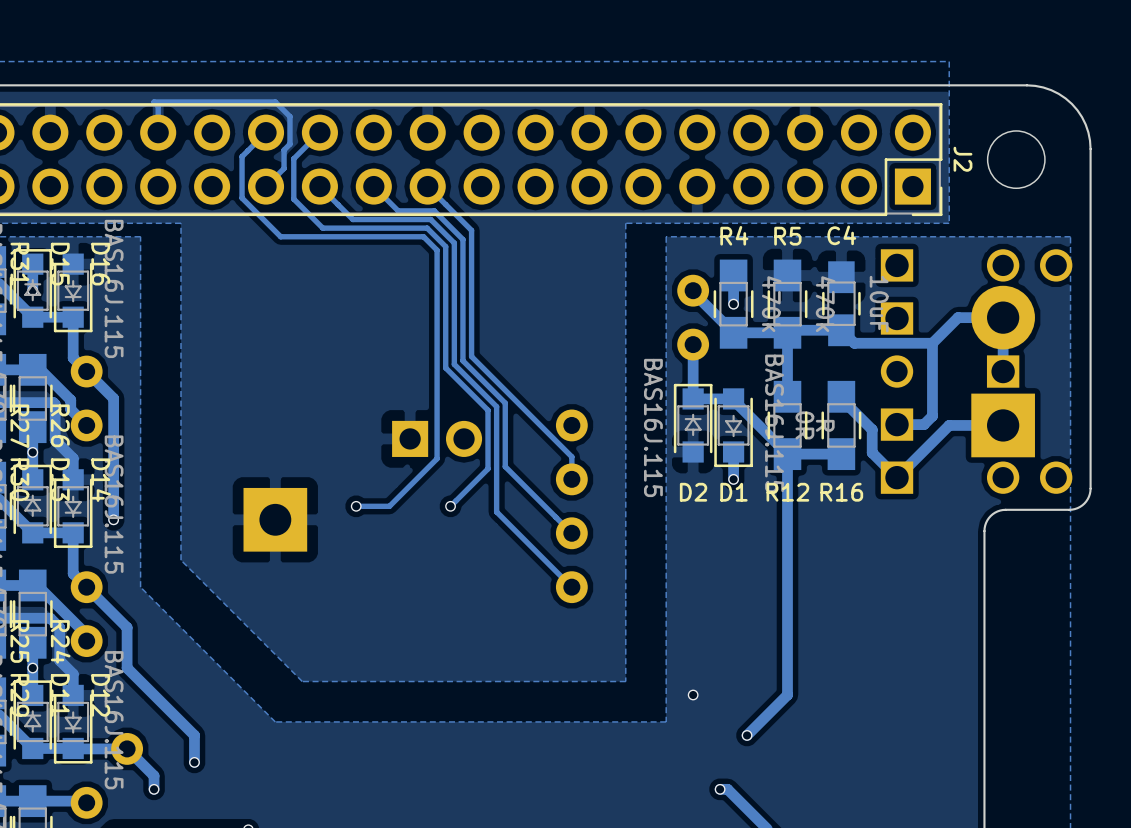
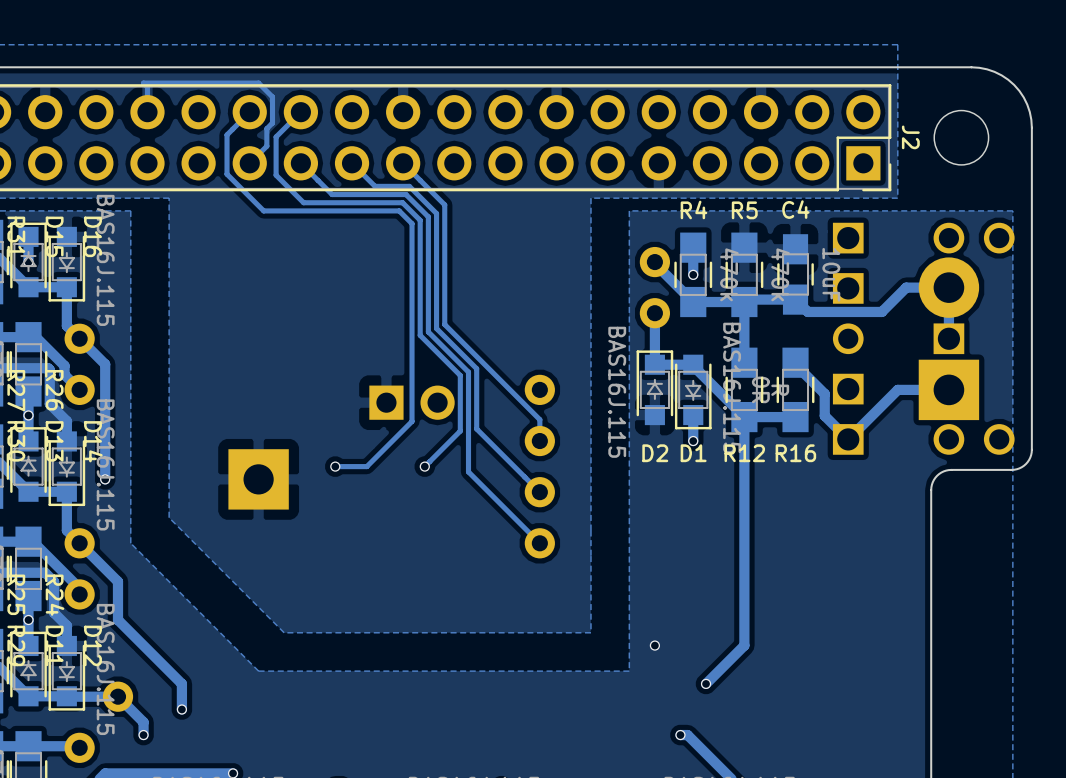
track: (932, 343) (932, 416) (923, 424) (897, 424) -> none

